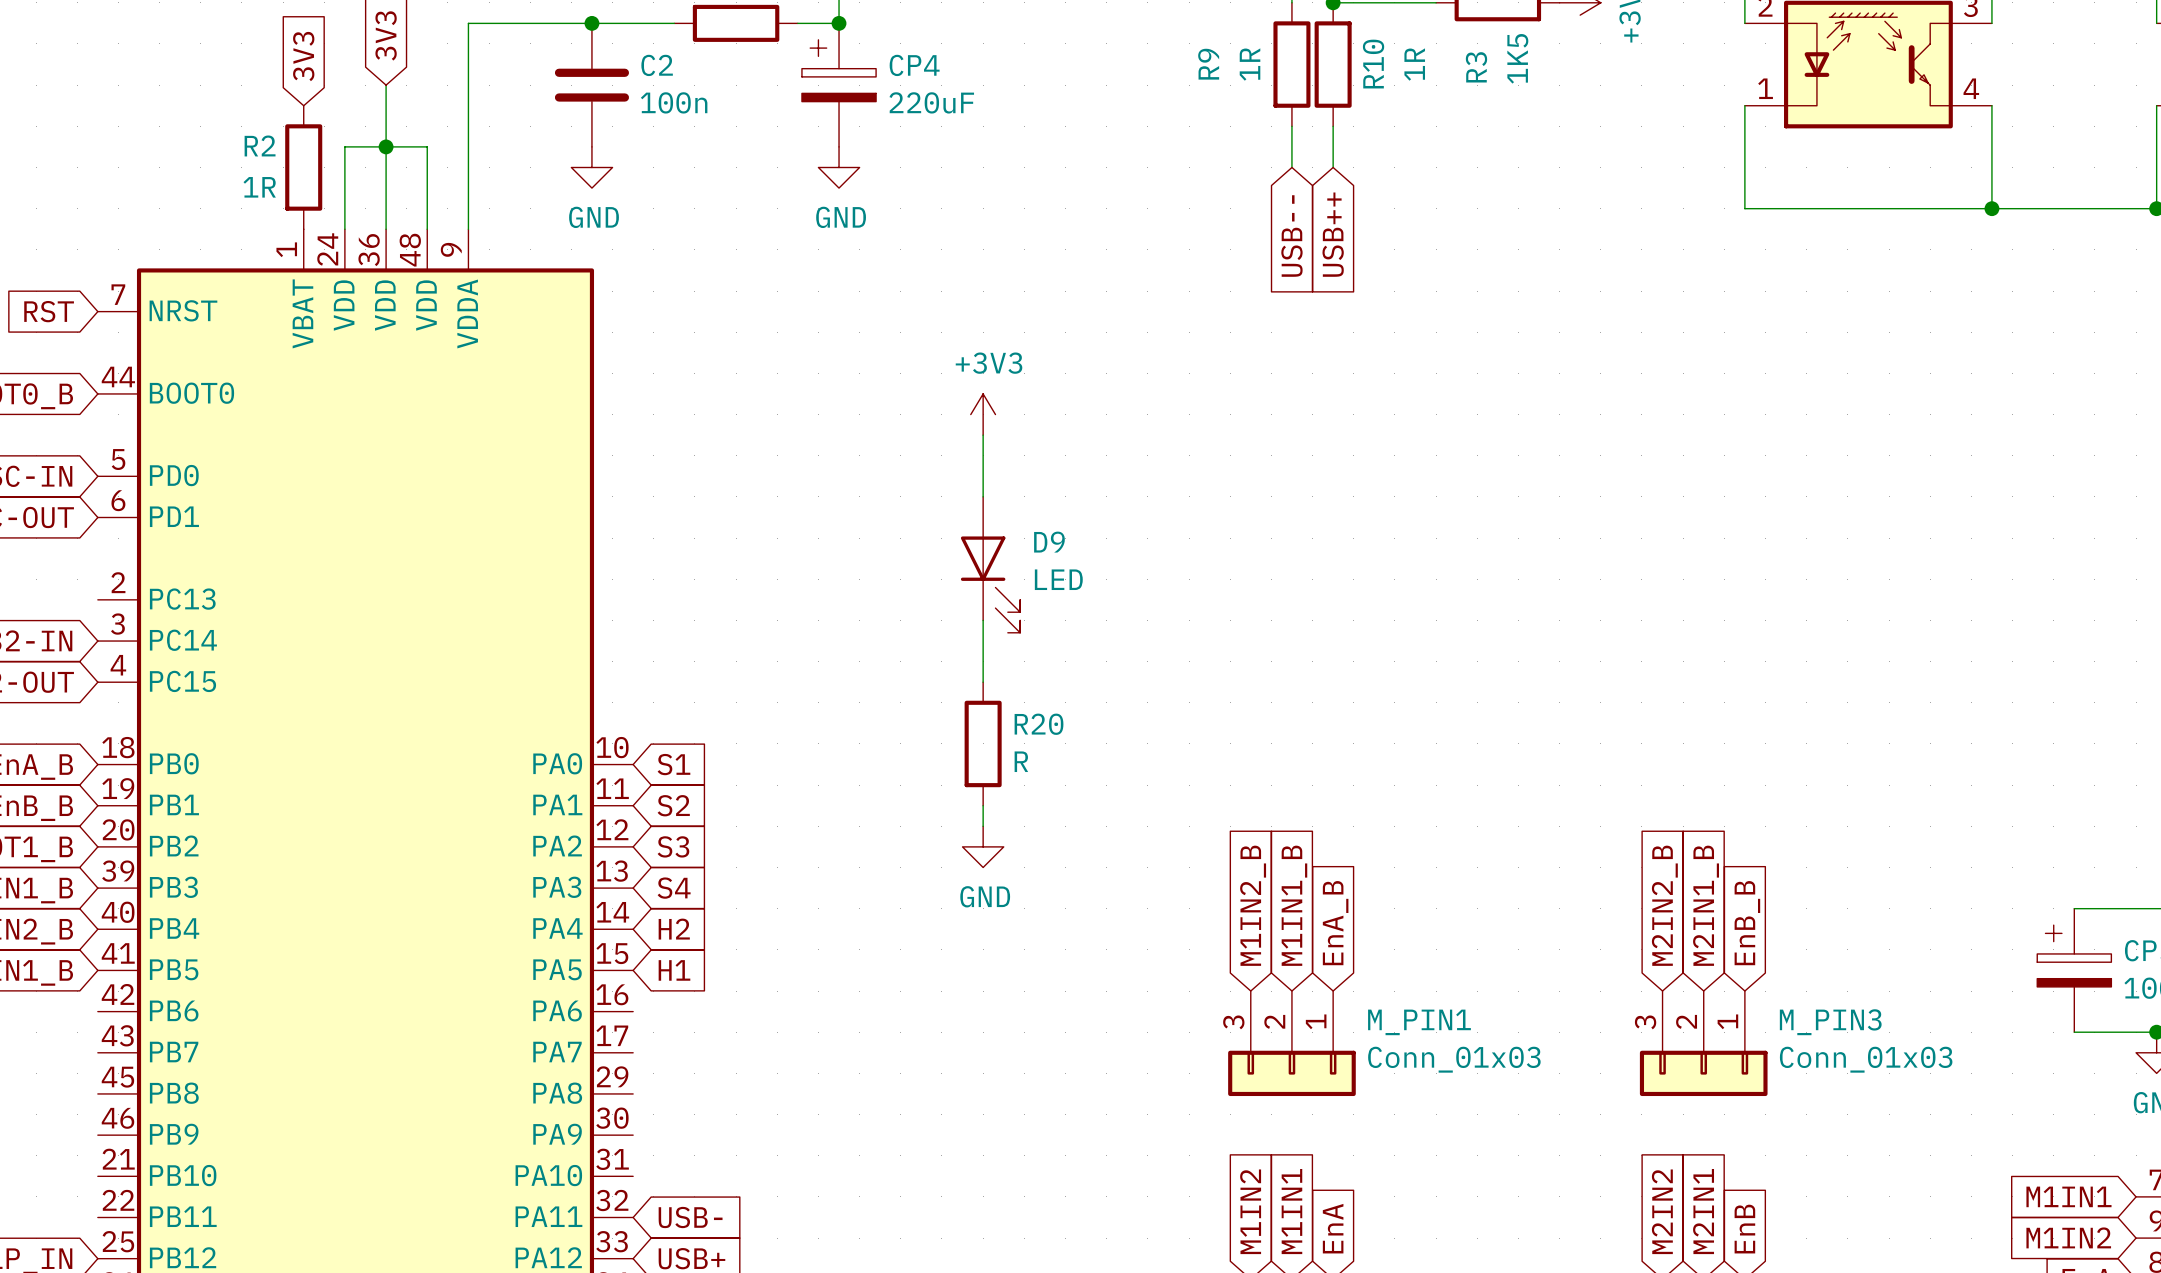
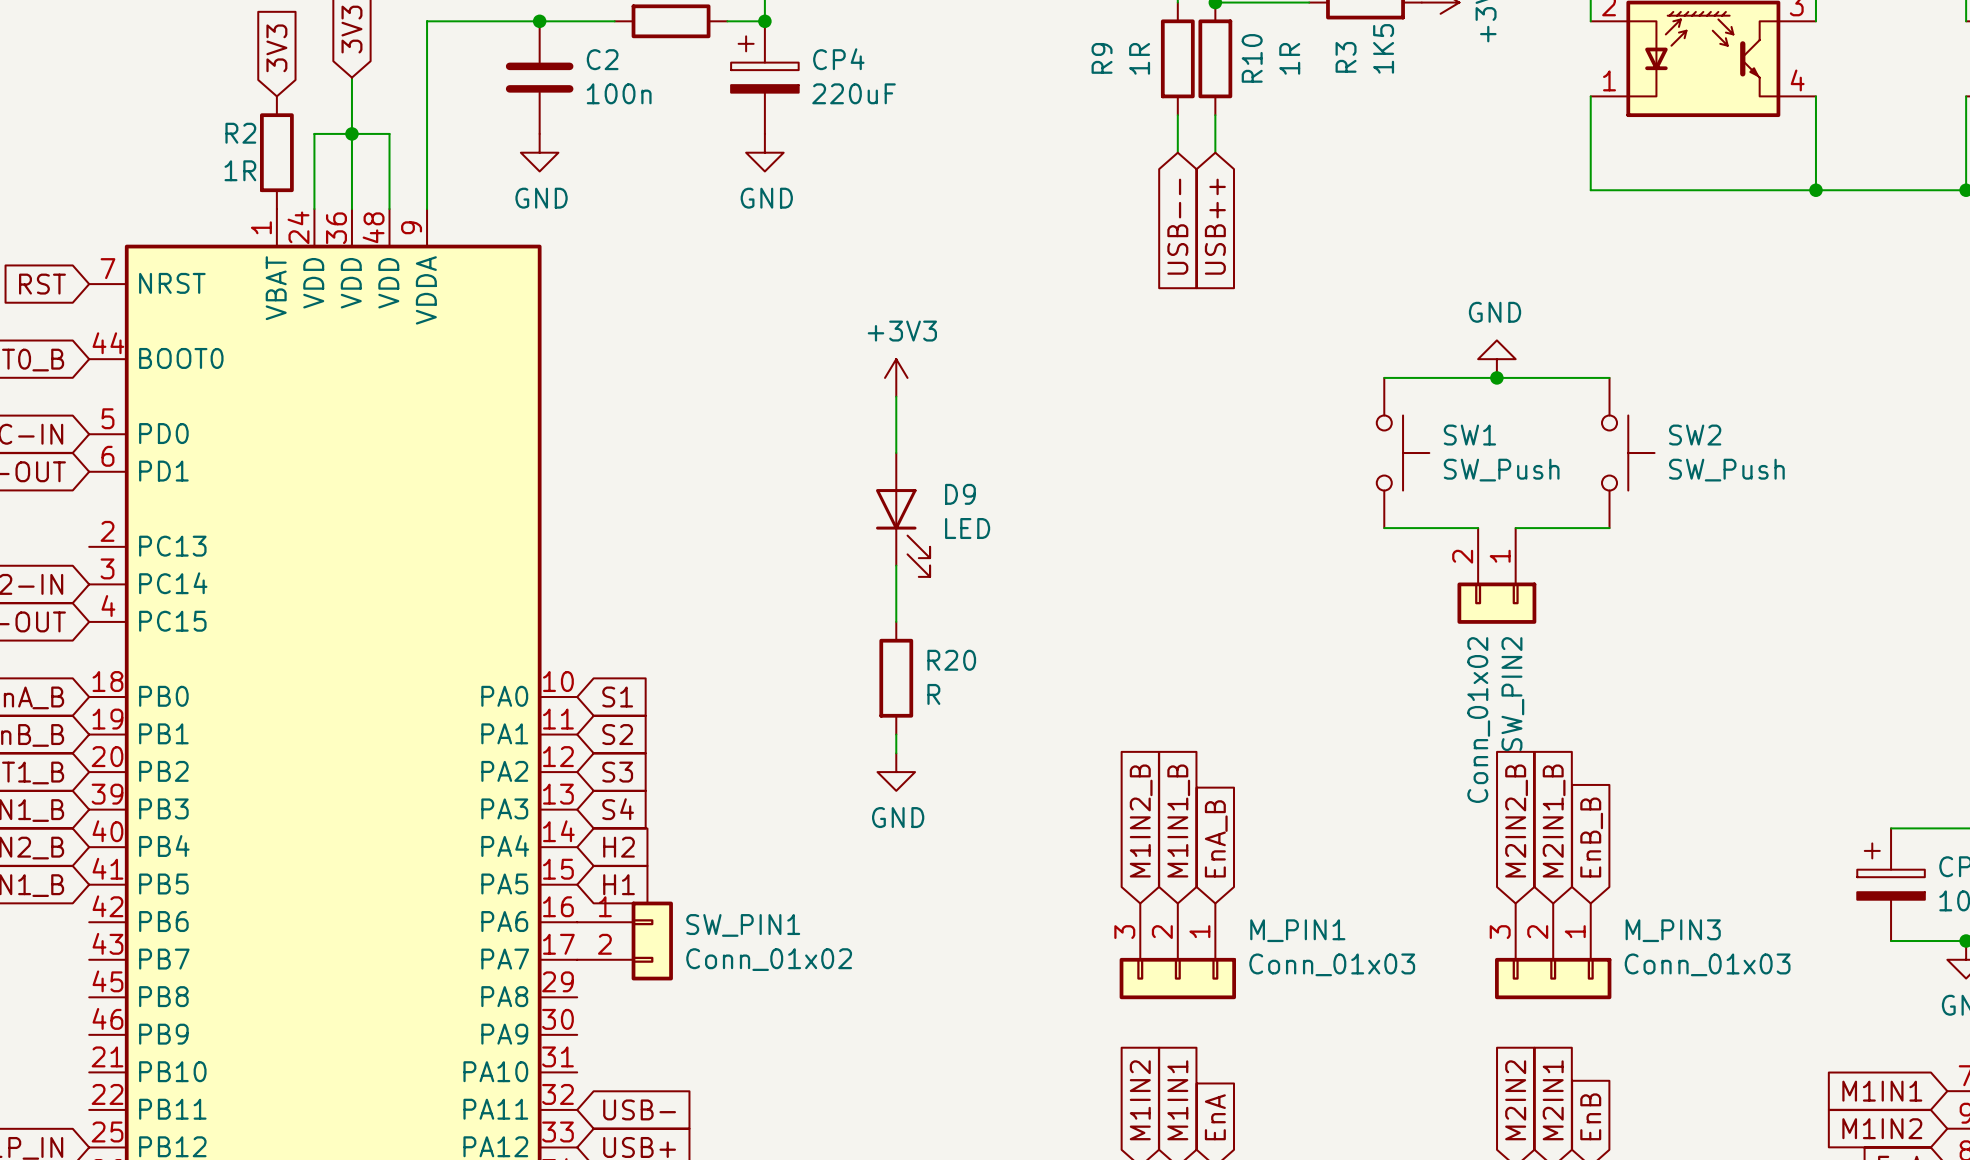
power symbol: none -> GND (1496, 359)
wire: none -> (1384, 377) (1609, 377)
junction: none -> (1496, 377)
SW1: none -> SW_Push (1403, 453)
SW2: none -> SW_Push (1628, 453)
wire: none -> (1384, 528) (1478, 528)
wire: none -> (1515, 528) (1609, 528)
SW_PIN2: none -> Conn_01x02 (1496, 575)
SW_PIN1: none -> Conn_01x02 (625, 941)

